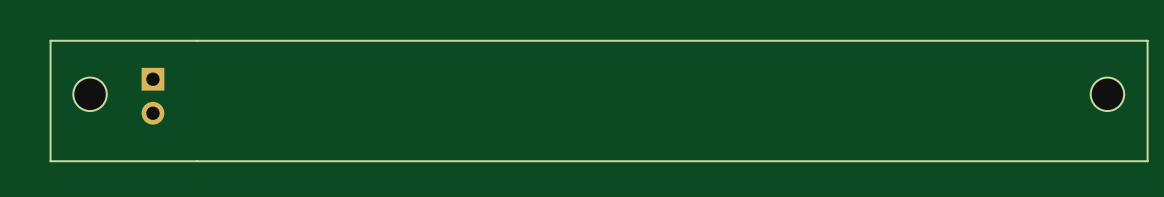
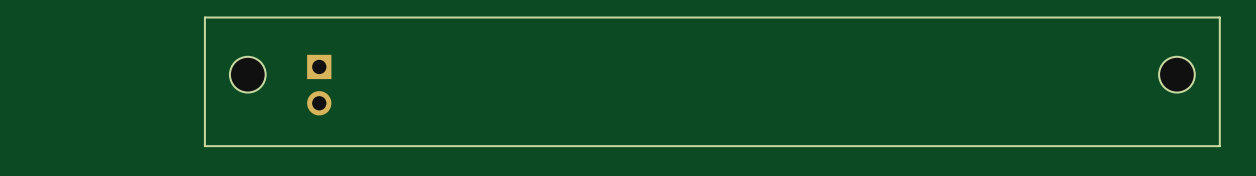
board edge: (197, 40) (50, 40) (50, 161) (197, 161) -> (204, 17) (204, 146)
part position: (90, 94) -> (247, 74)
part position: (152, 96) -> (319, 85)

